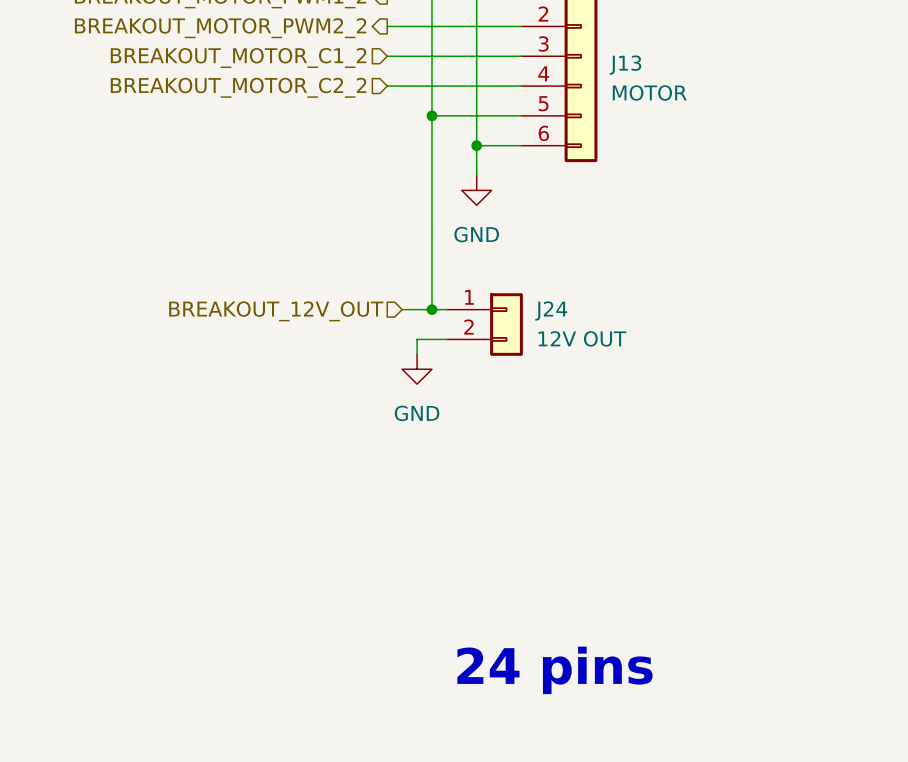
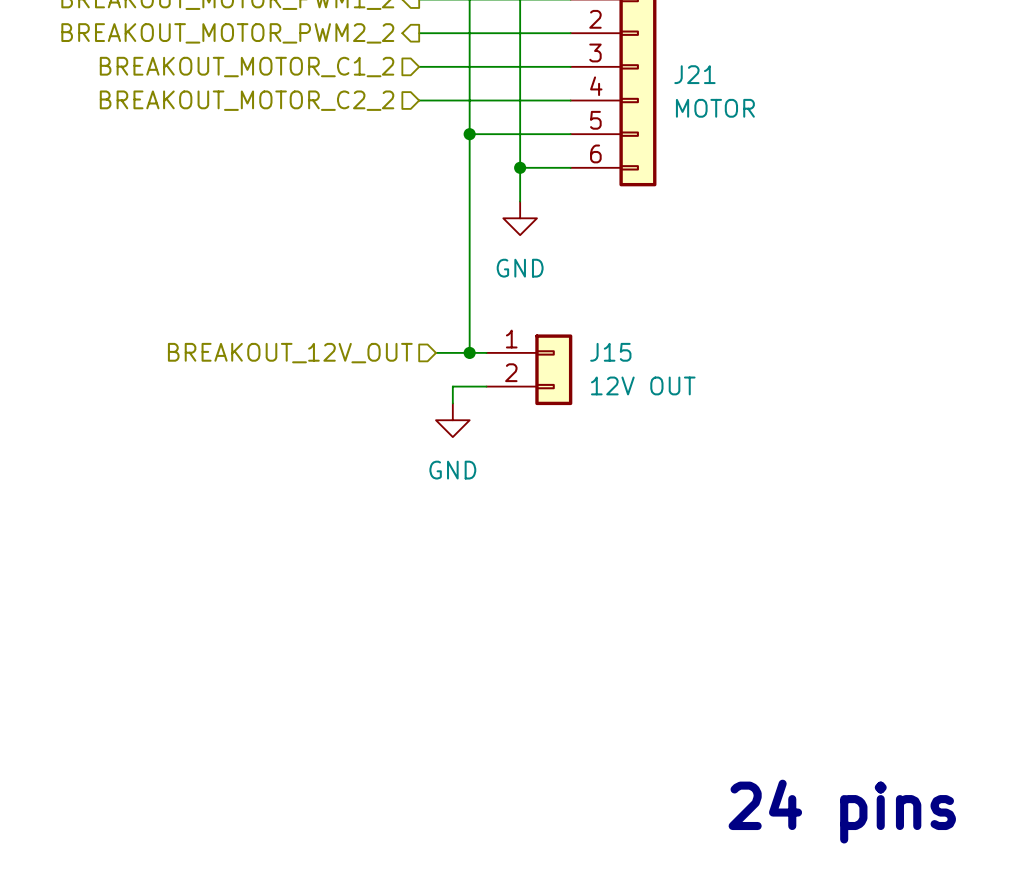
J13 name: J13 (625, 65) -> J21 (694, 74)
J24 name: J24 (551, 310) -> J15 (610, 352)
text position: 24 pins (554, 670) -> 24 pins (842, 811)

